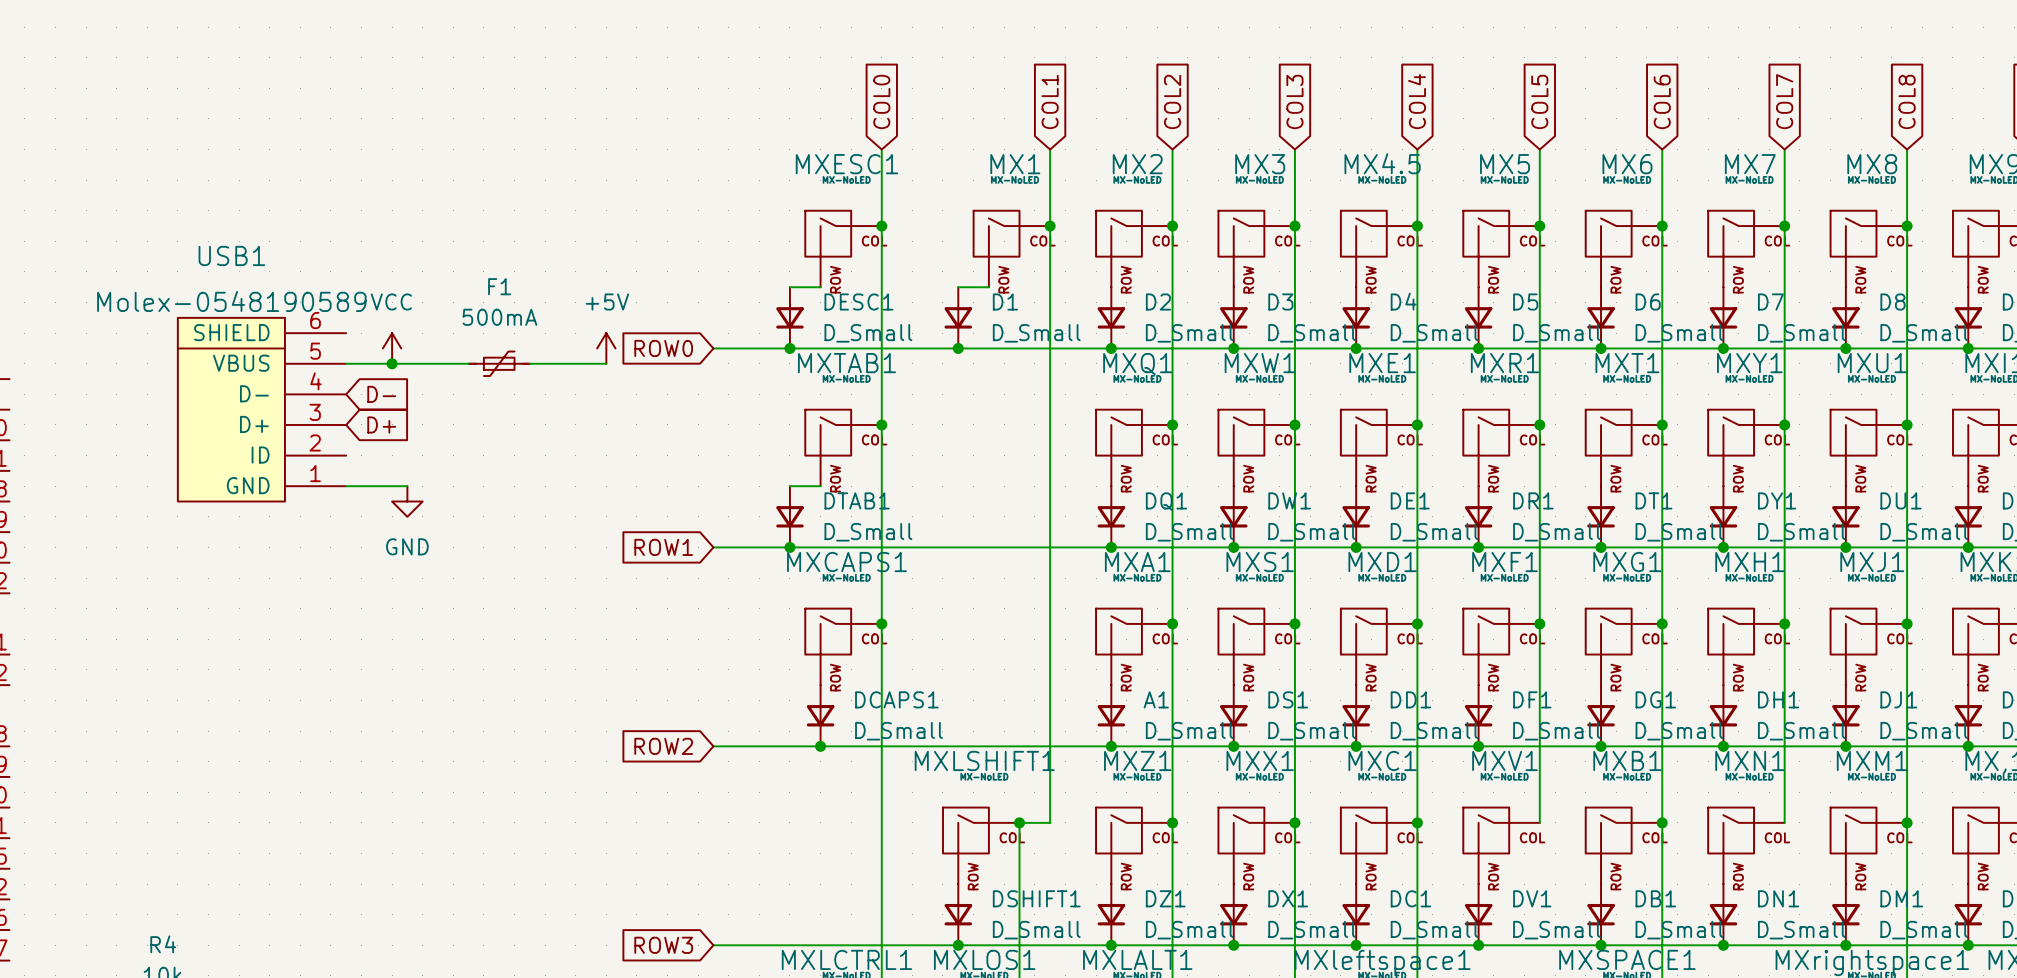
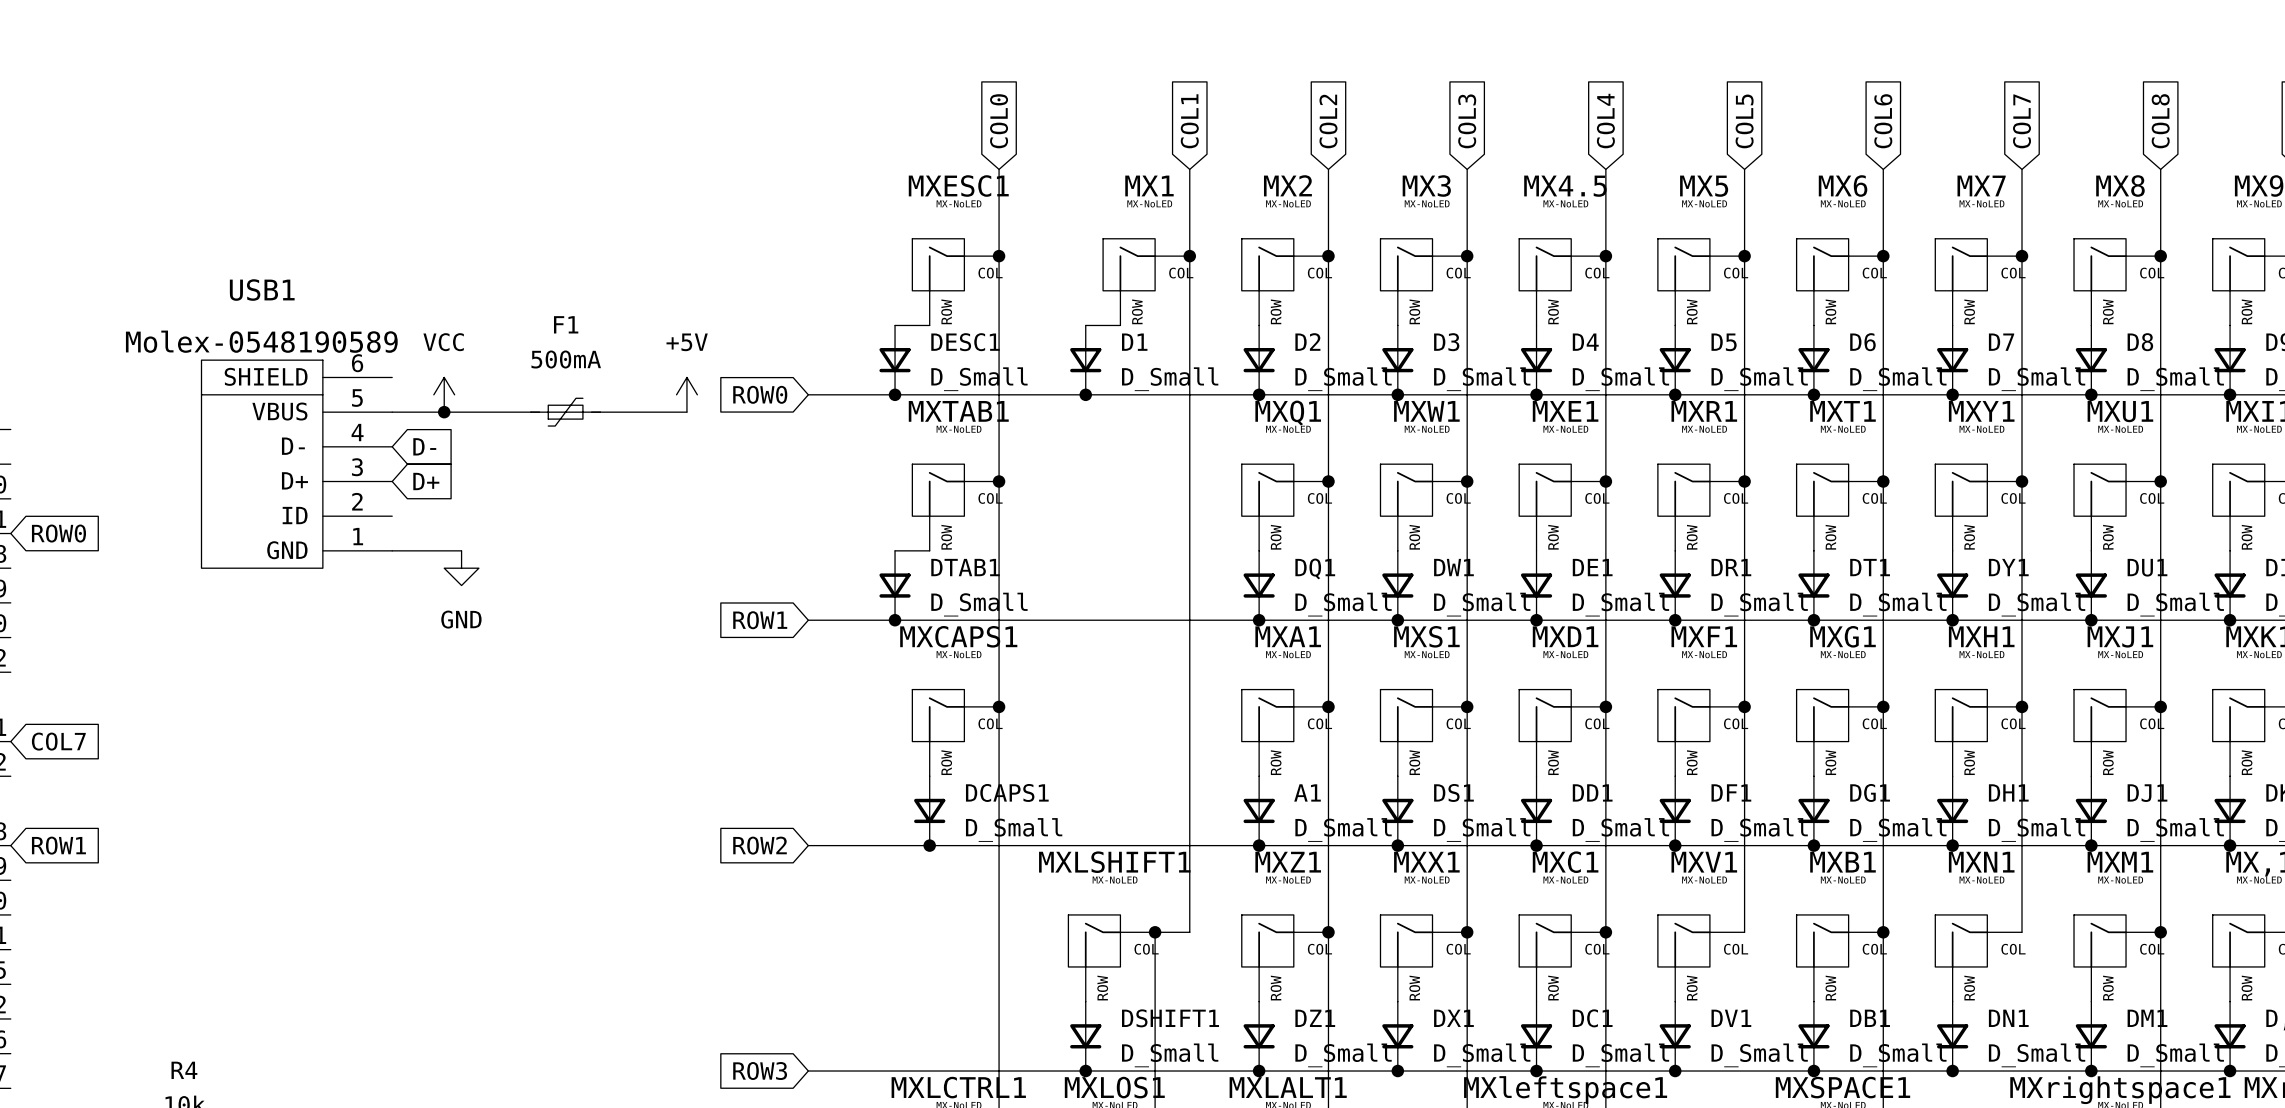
global label: none -> ROW0 (58, 533)
global label: none -> COL7 (58, 741)
global label: none -> ROW1 (58, 845)

